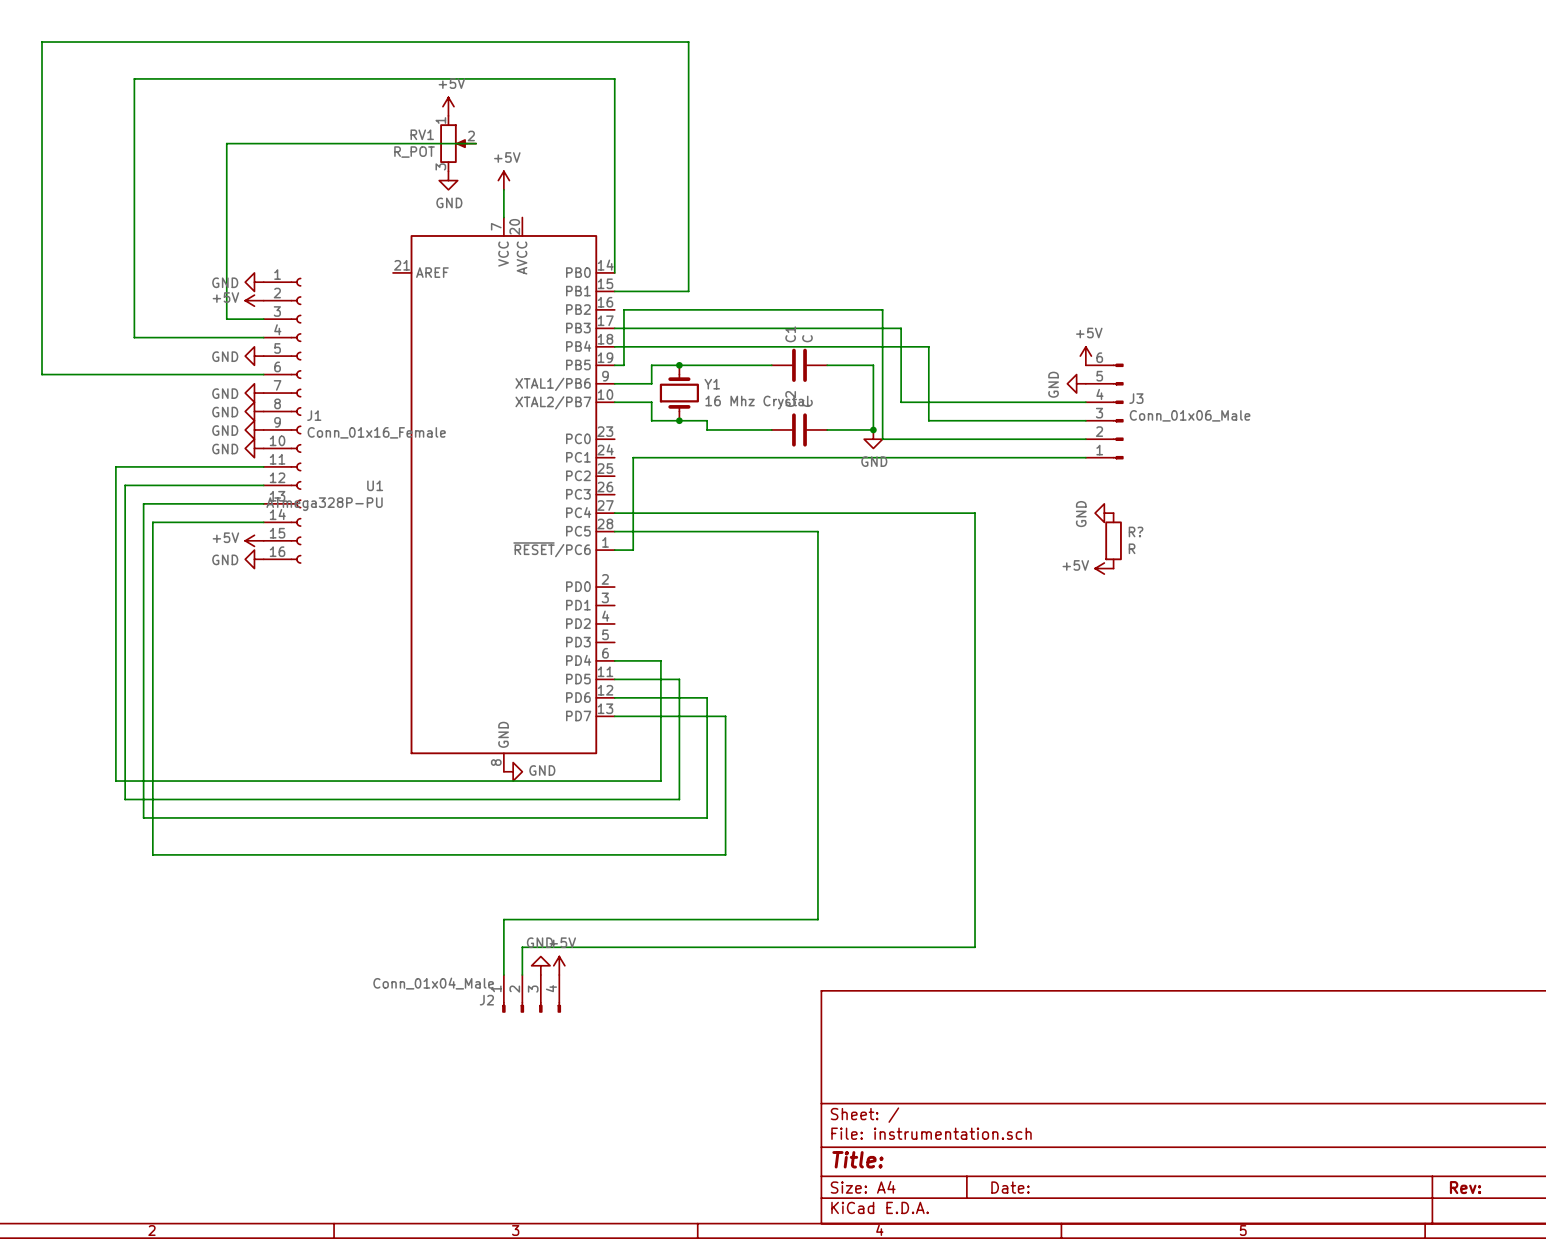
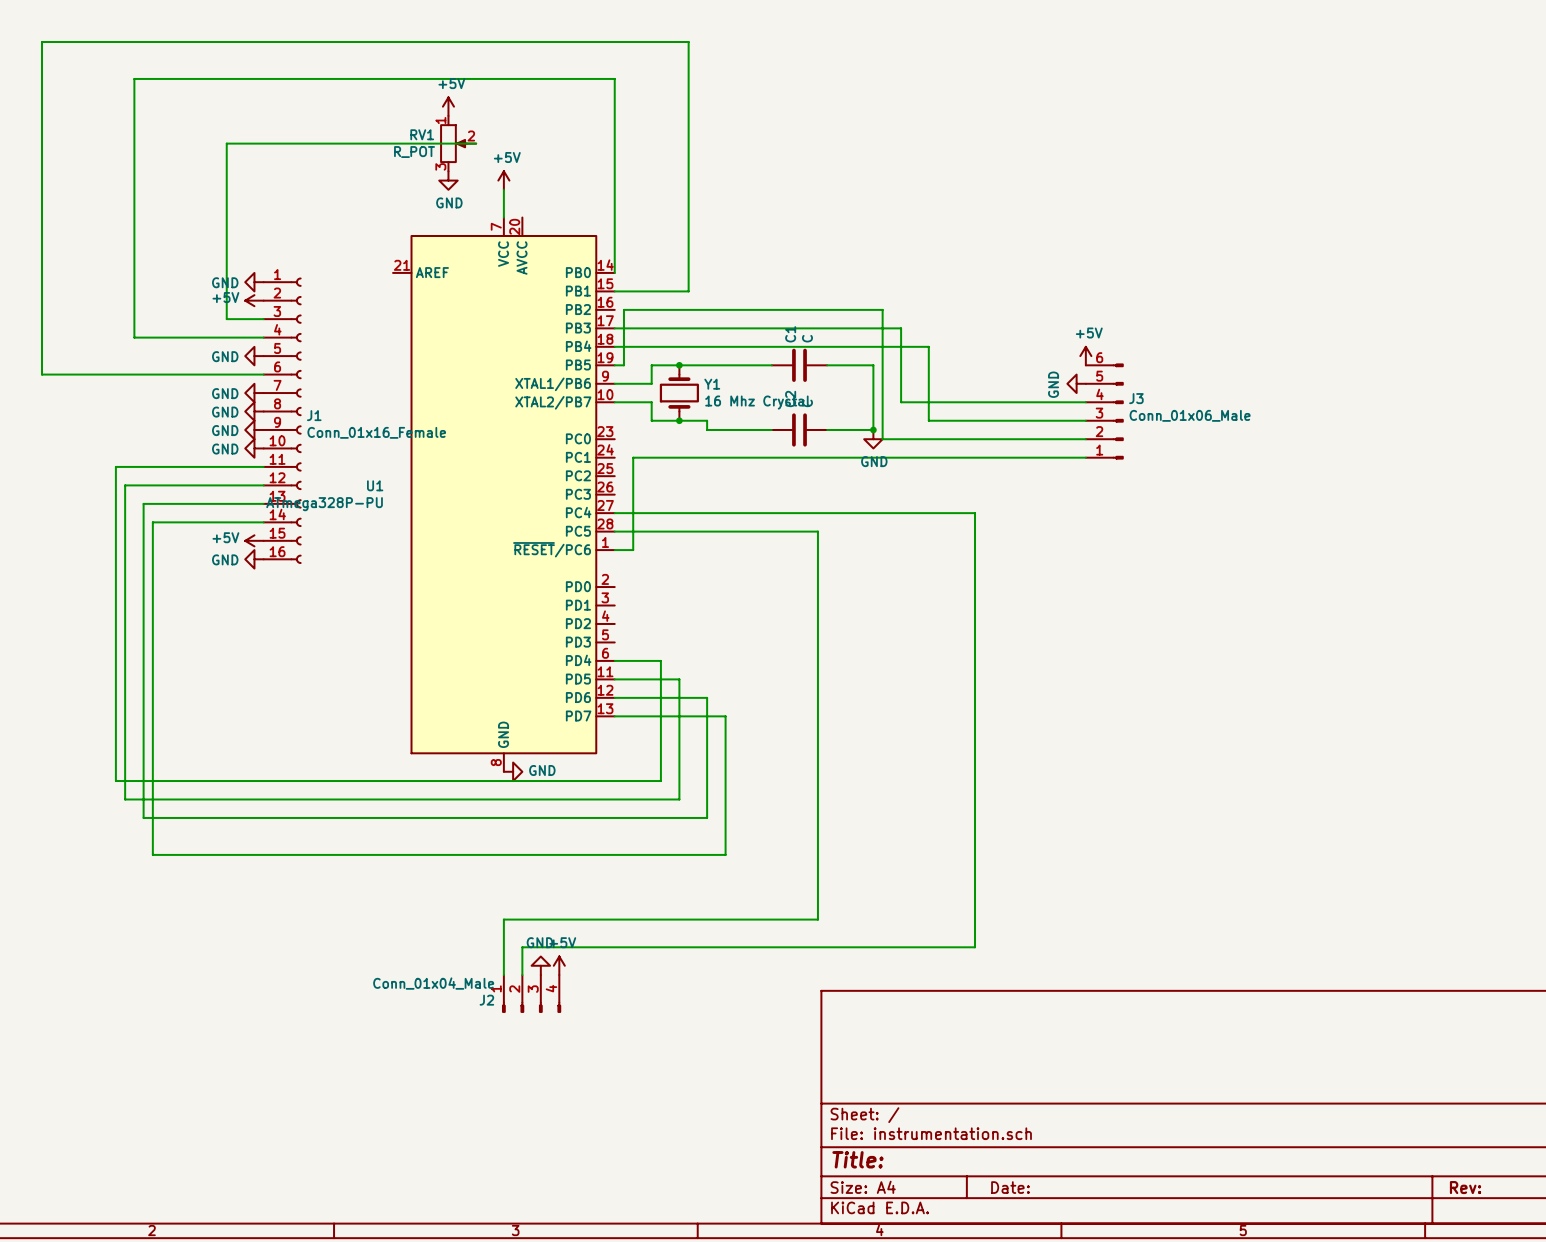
power symbol: GND (1104, 513) -> none
R?: R (1113, 540) -> none
power symbol: +5V (1104, 568) -> none

